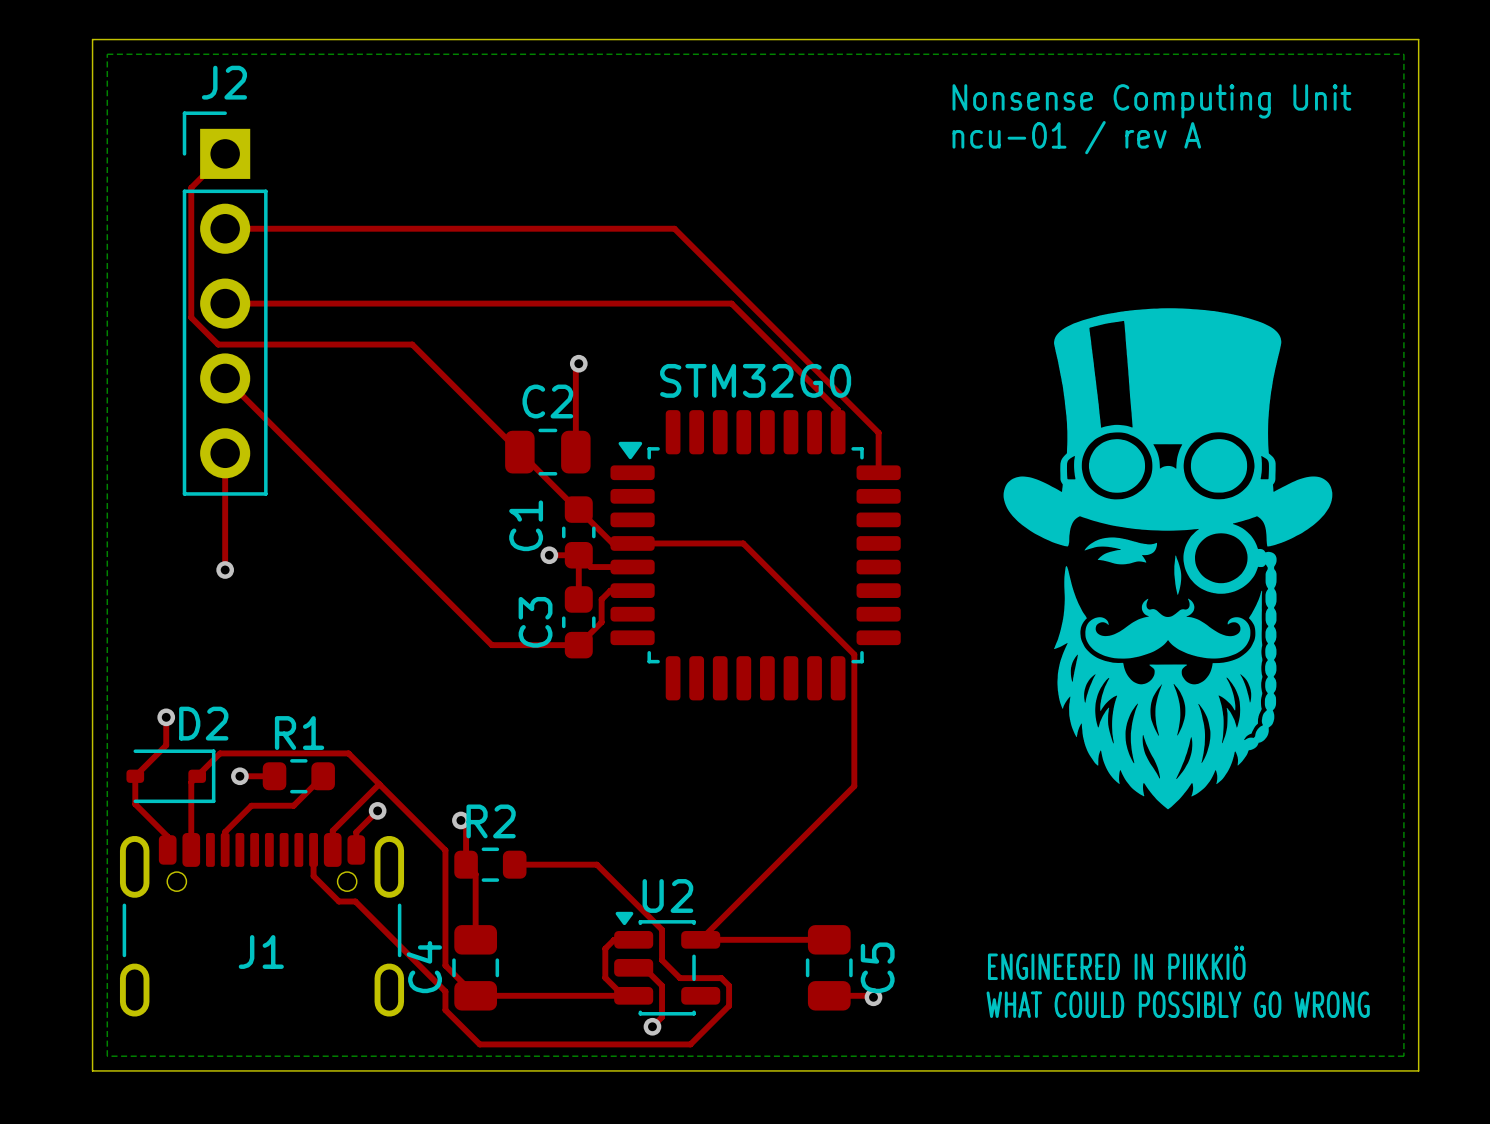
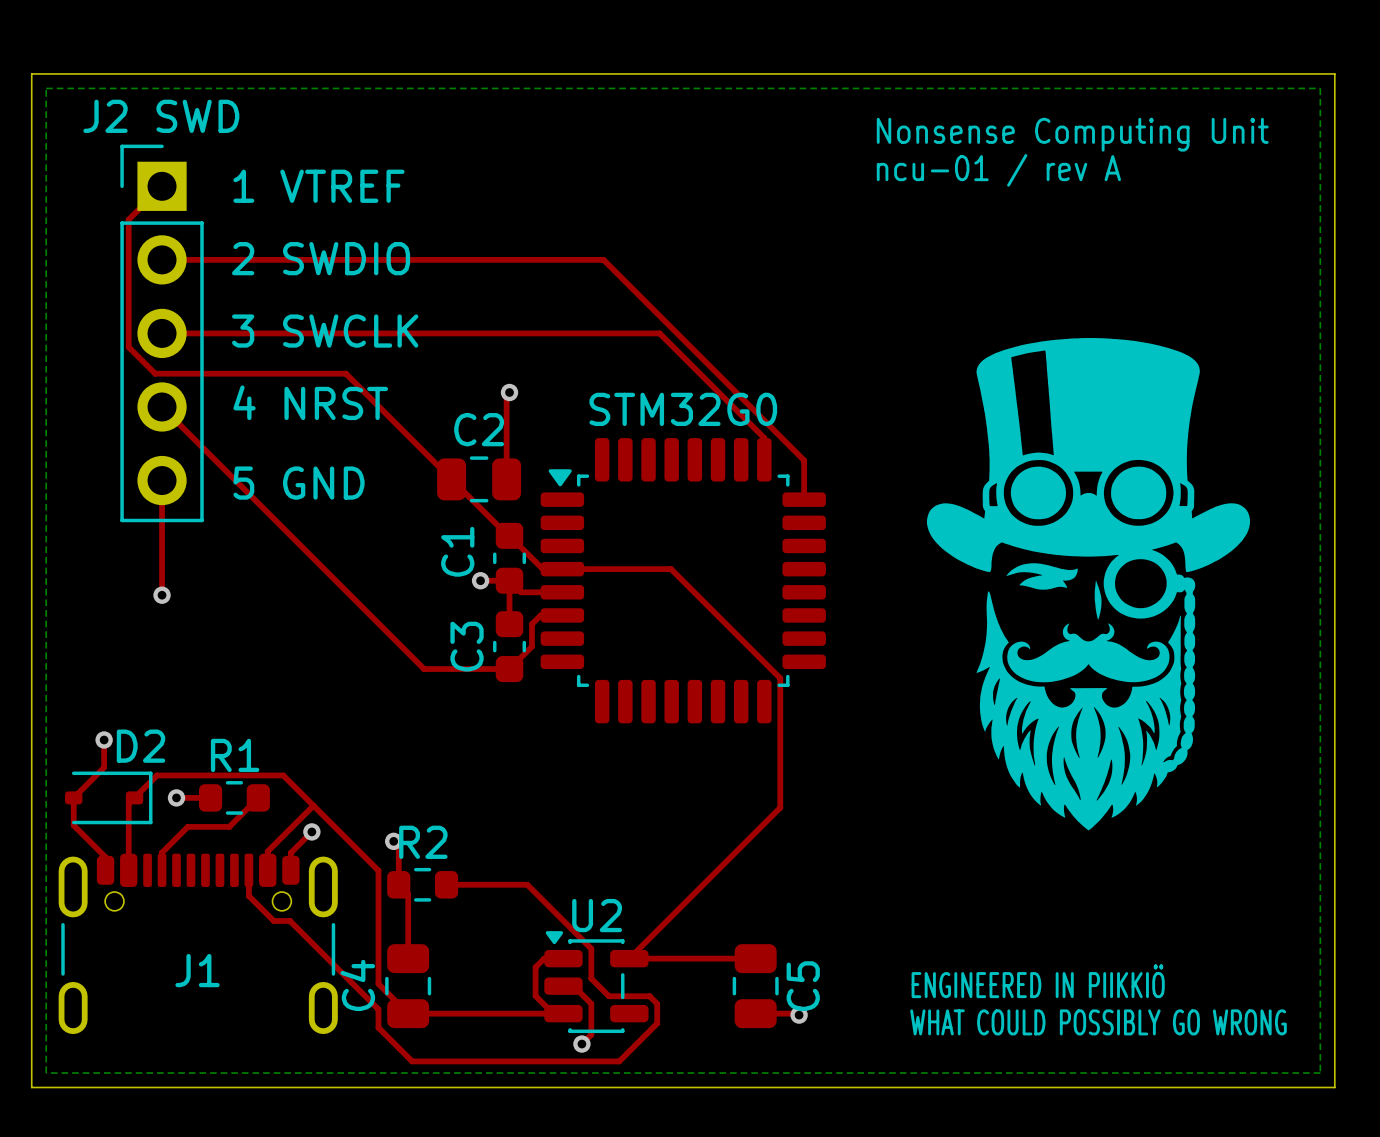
J2 name: J2 (224, 82) -> J2 SWD (161, 116)
text: none -> 1 VTREF (318, 186)
text: none -> 2 SWDIO (321, 258)
text: none -> 3 SWCLK (325, 331)
text: none -> 4 NRST (310, 402)
text: none -> 5 GND (298, 483)

